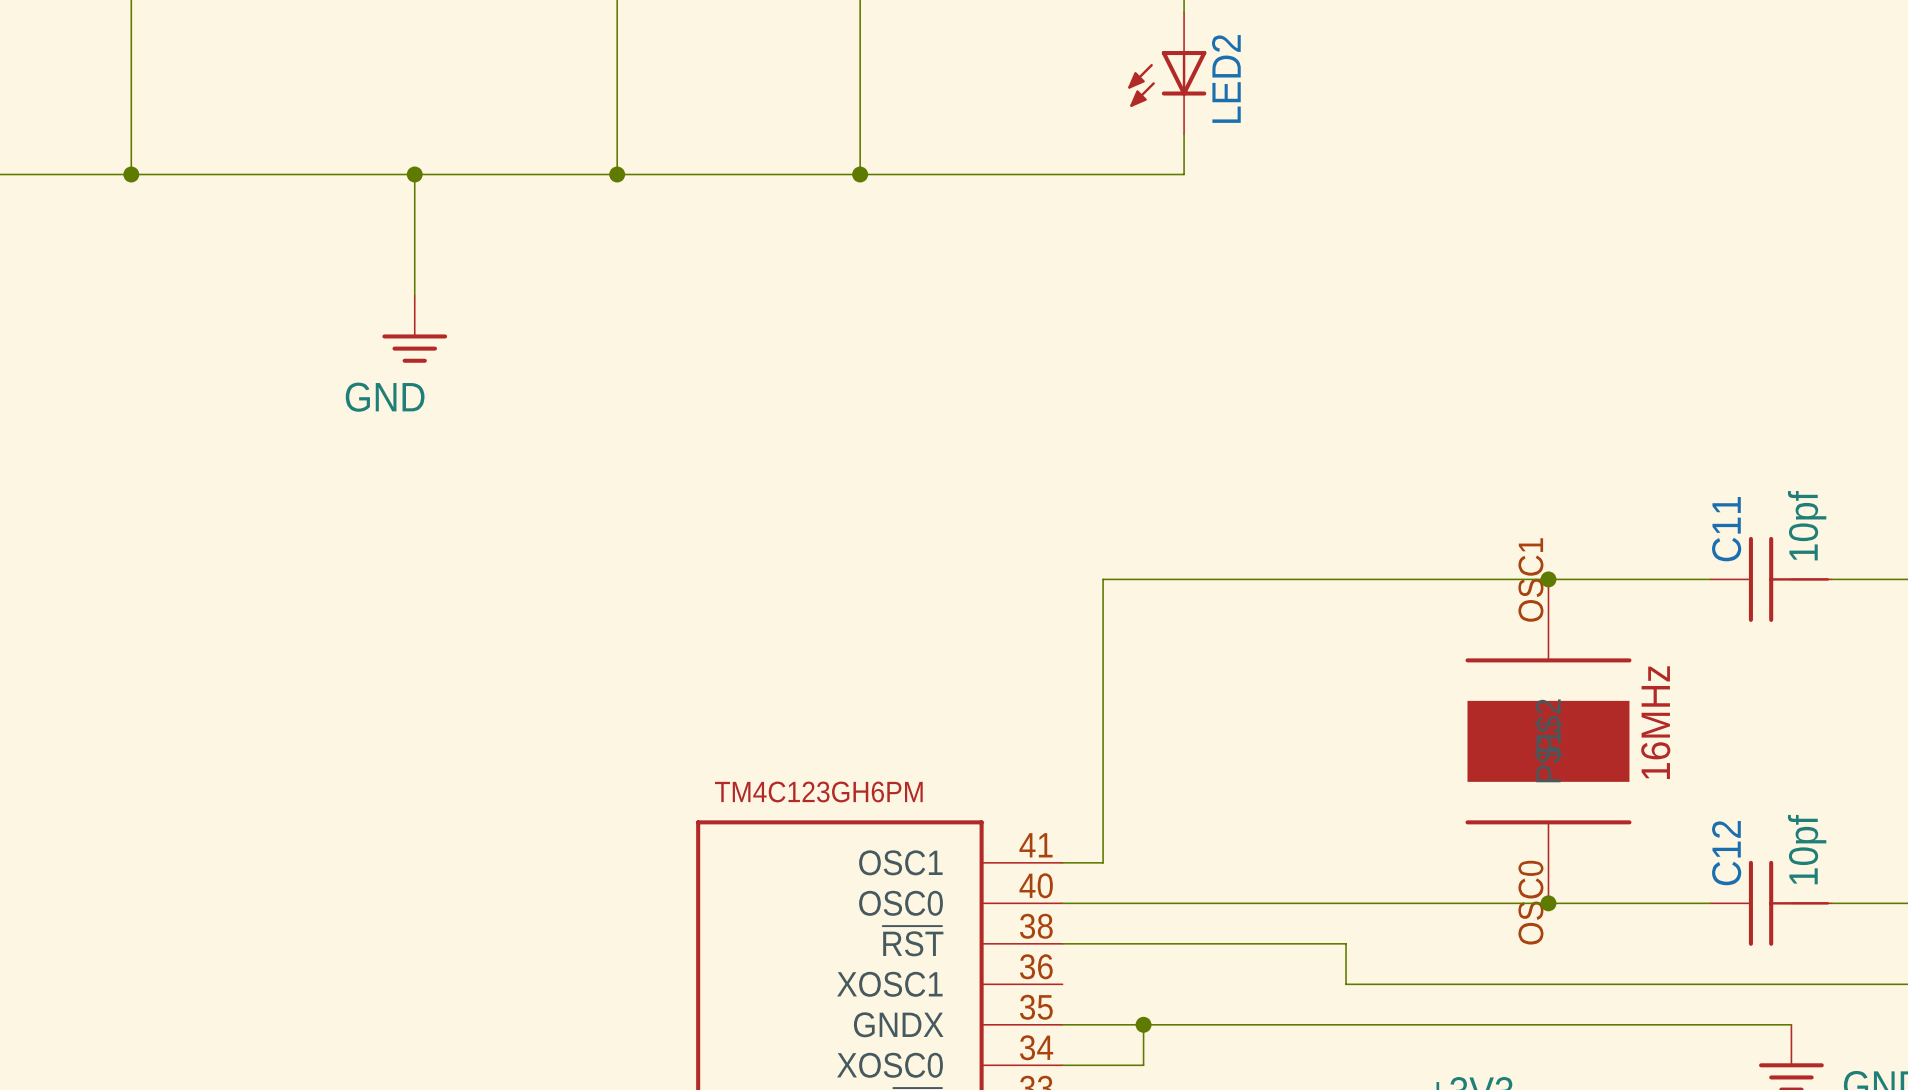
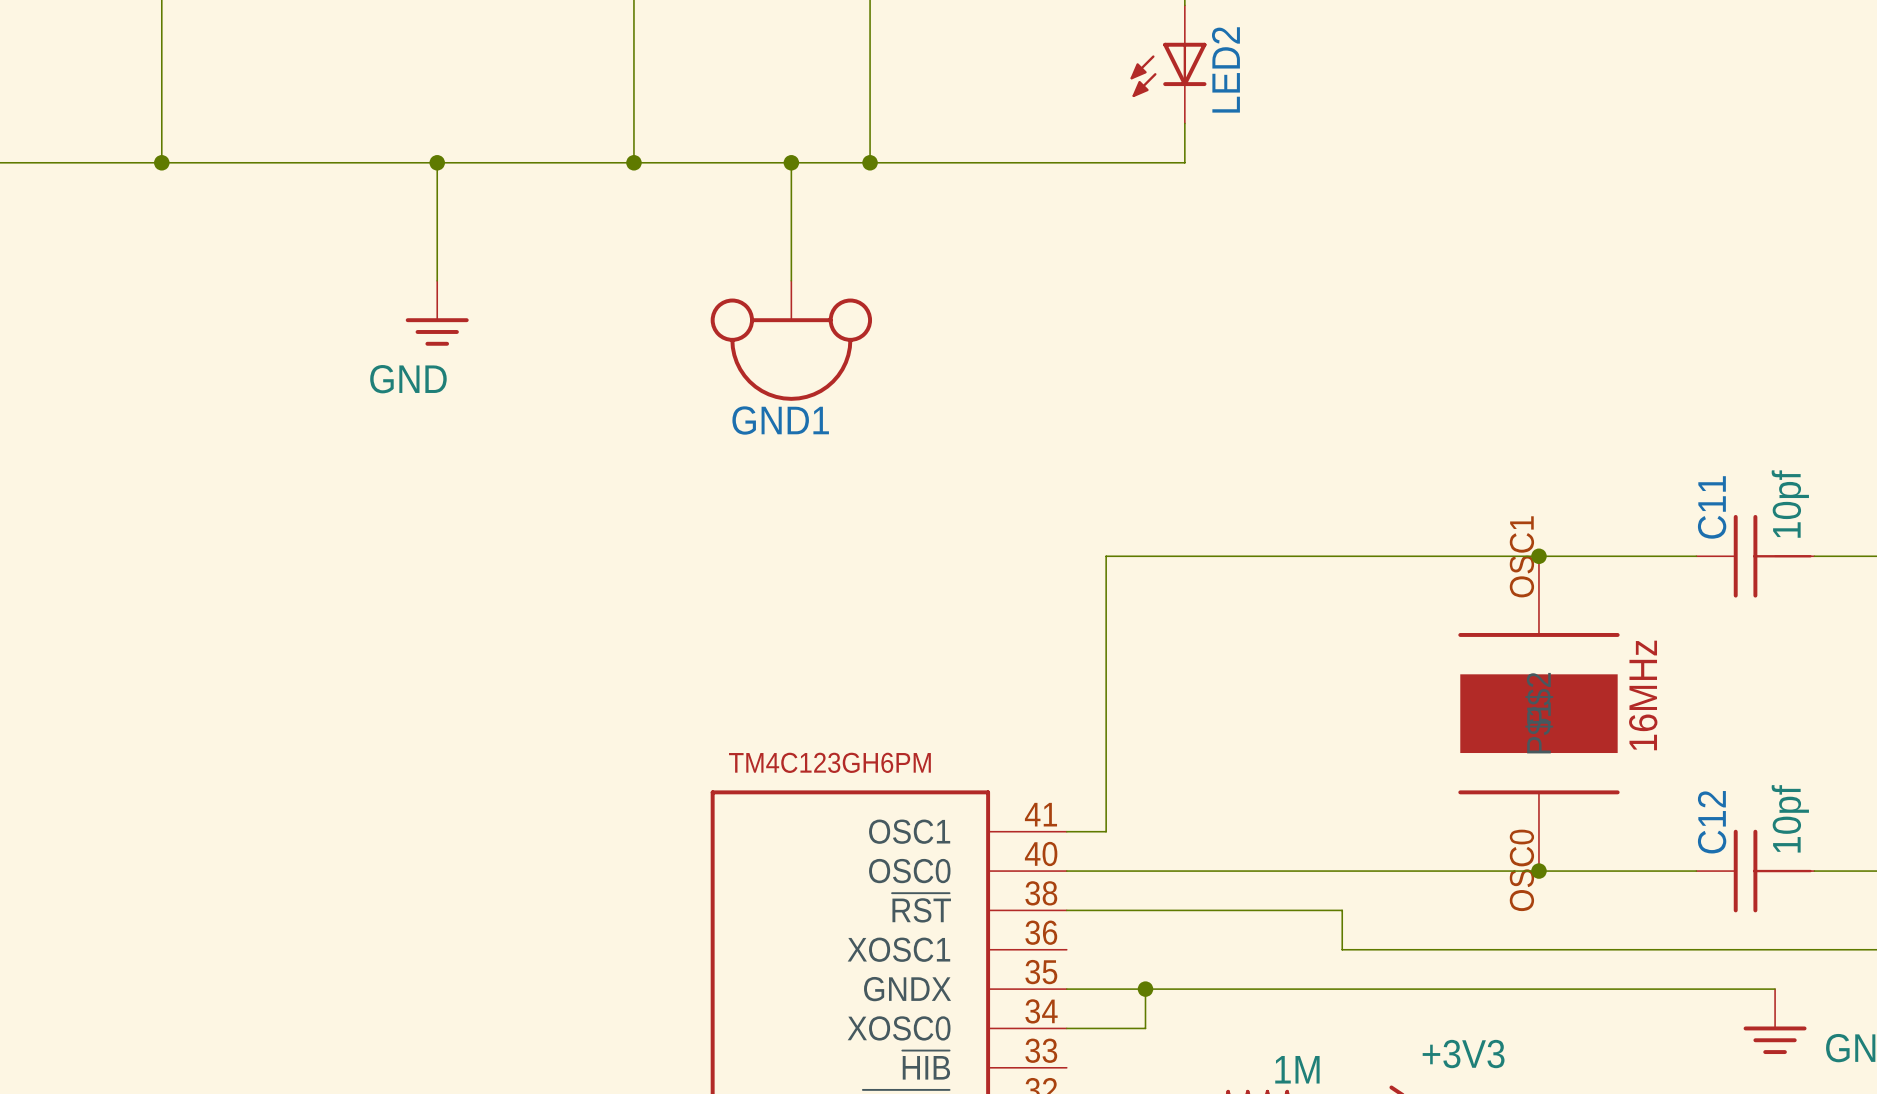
wire: none -> (791, 162) (791, 280)
junction: none -> (791, 162)
GND1: none -> (791, 340)

